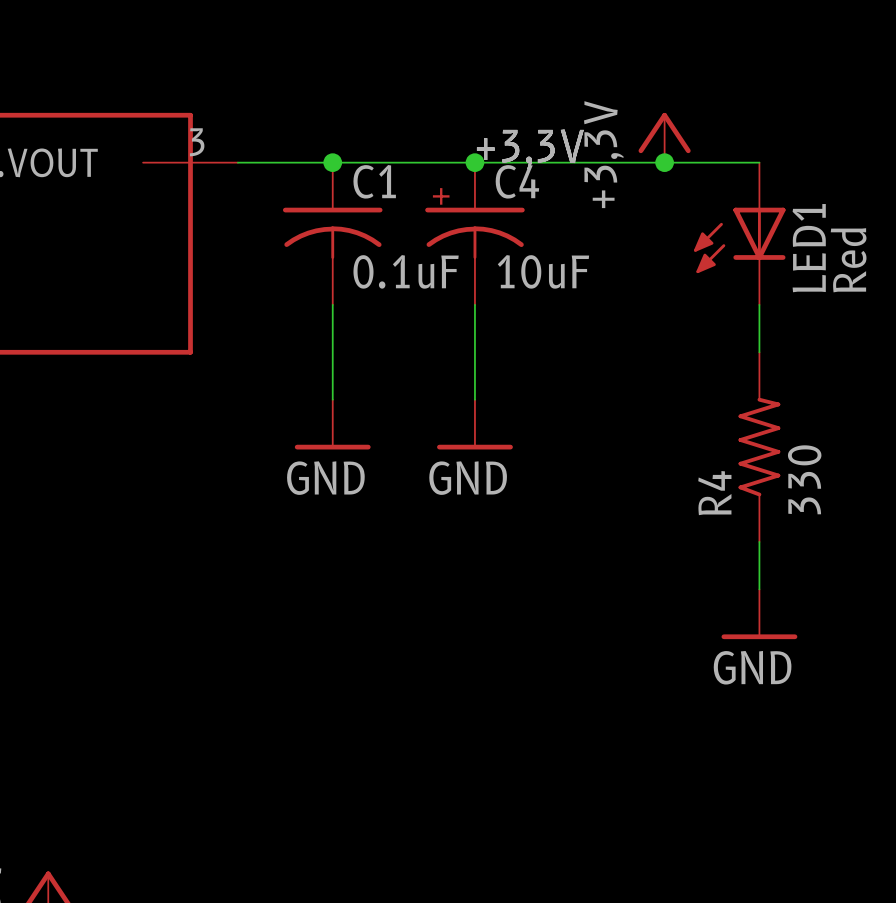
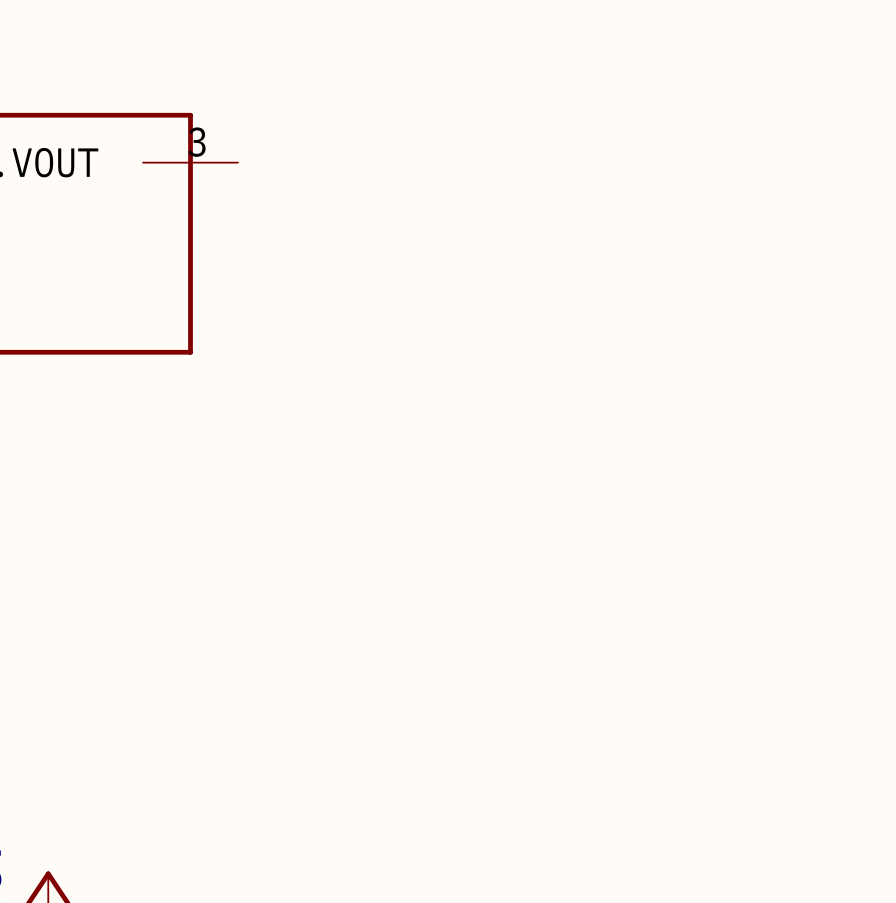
power symbol: +3,3V (664, 137) -> none
label: +3,3V (530, 149) -> none
wire: (237, 162) (759, 162) -> none
junction: (332, 162) -> none
junction: (474, 162) -> none
junction: (664, 162) -> none
C1: 0.1uF (332, 233) -> none
C4: 10uF (474, 233) -> none
LED1: Red (739, 233) -> none
wire: (332, 304) (332, 399) -> none
wire: (474, 304) (474, 399) -> none
wire: (759, 304) (759, 352) -> none
power symbol: GND (332, 424) -> none
power symbol: GND (474, 424) -> none
R4: 330 (759, 447) -> none
wire: (759, 541) (759, 589) -> none
power symbol: GND (759, 614) -> none

